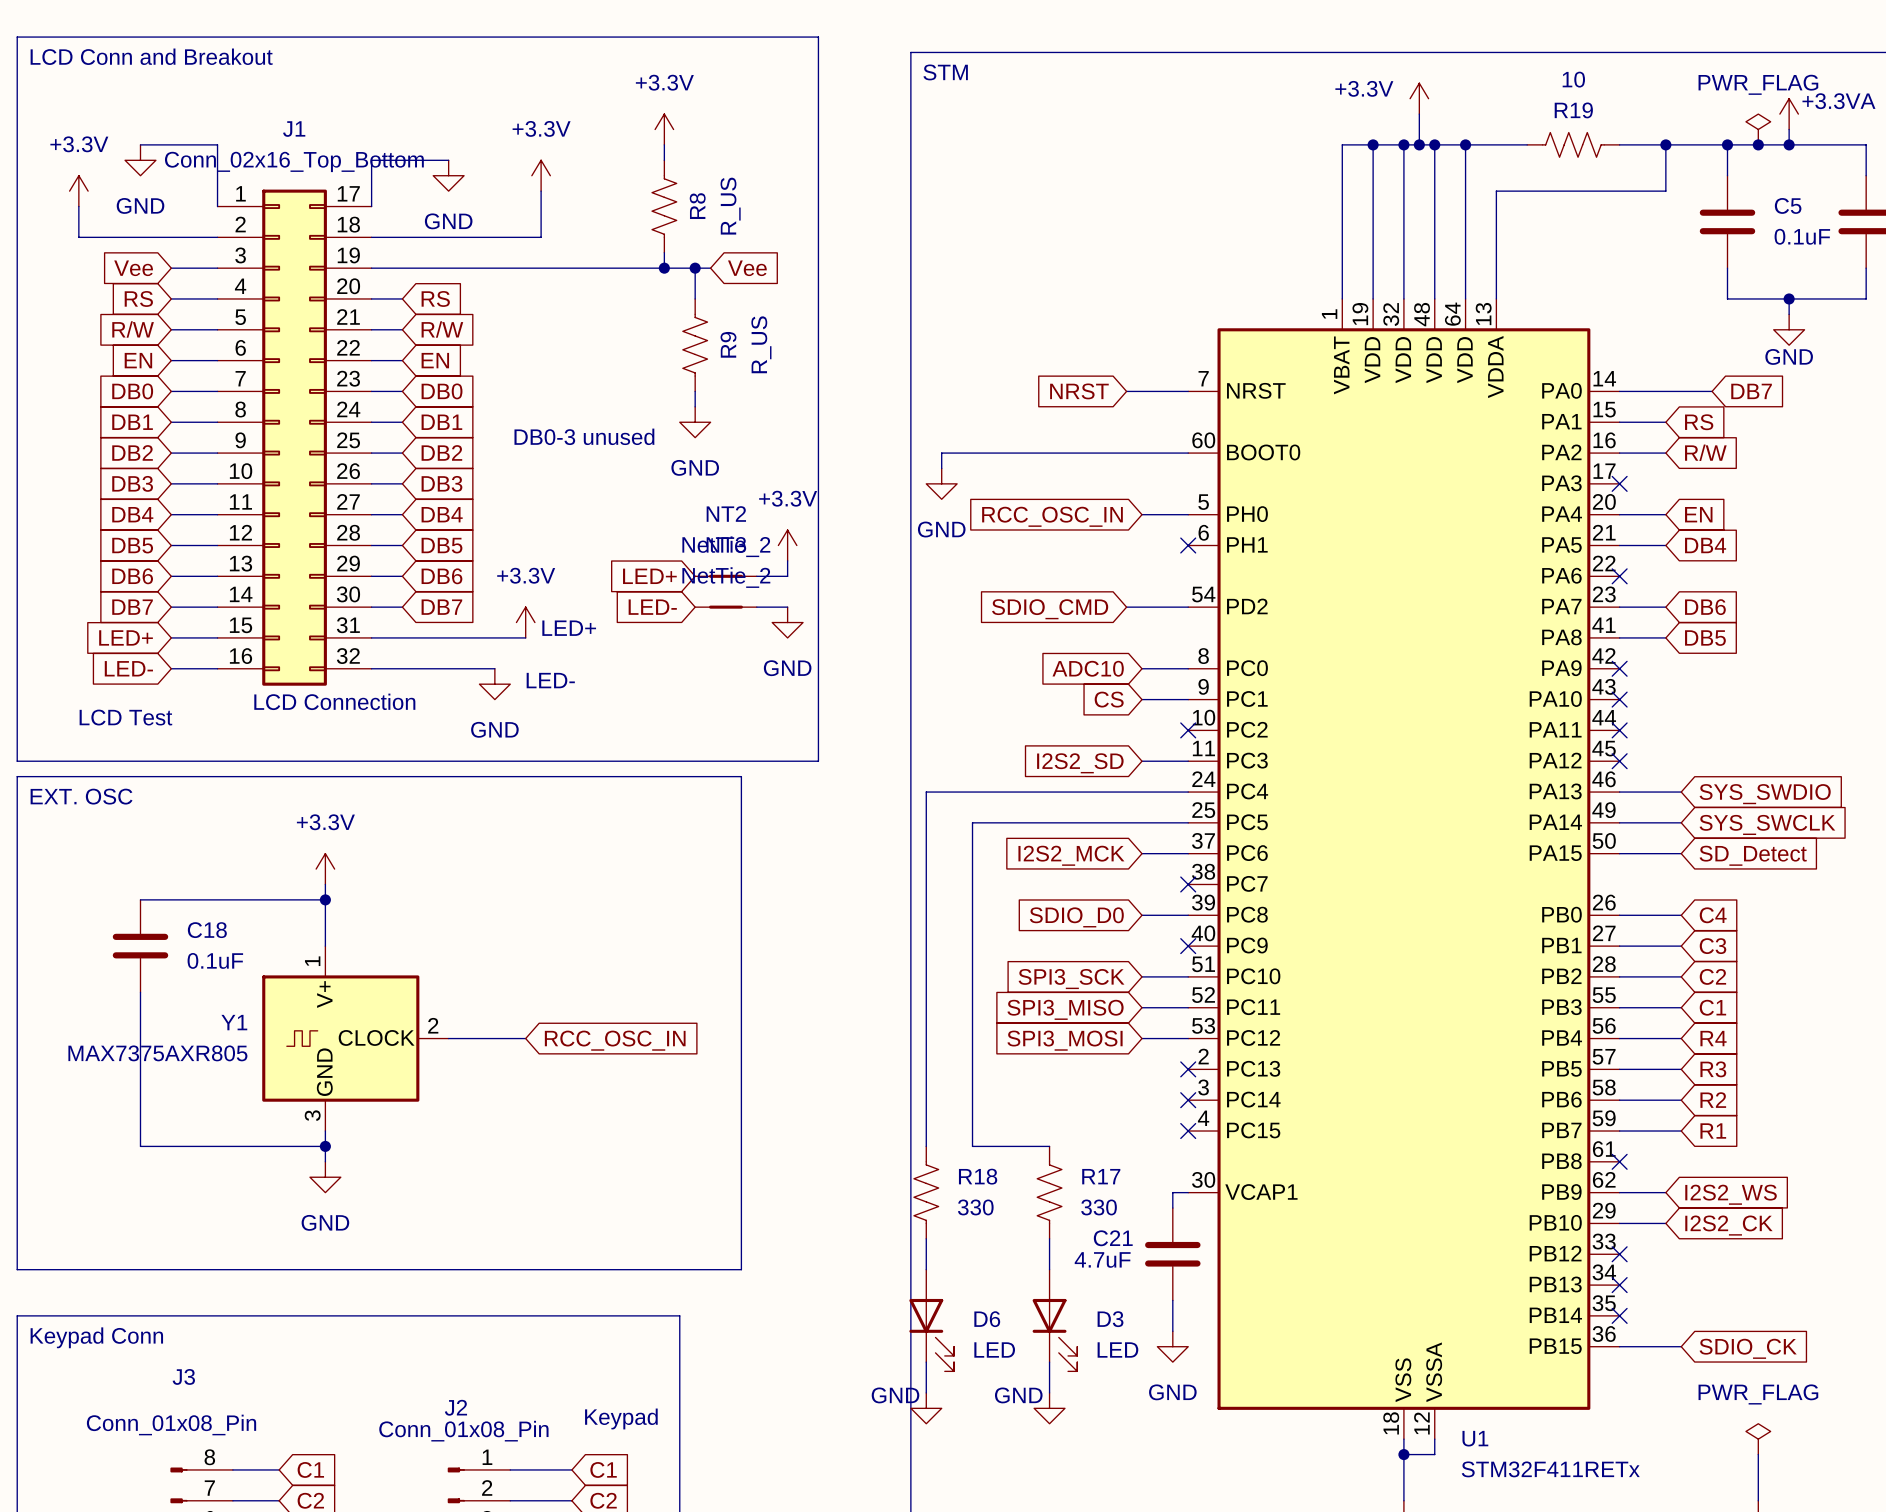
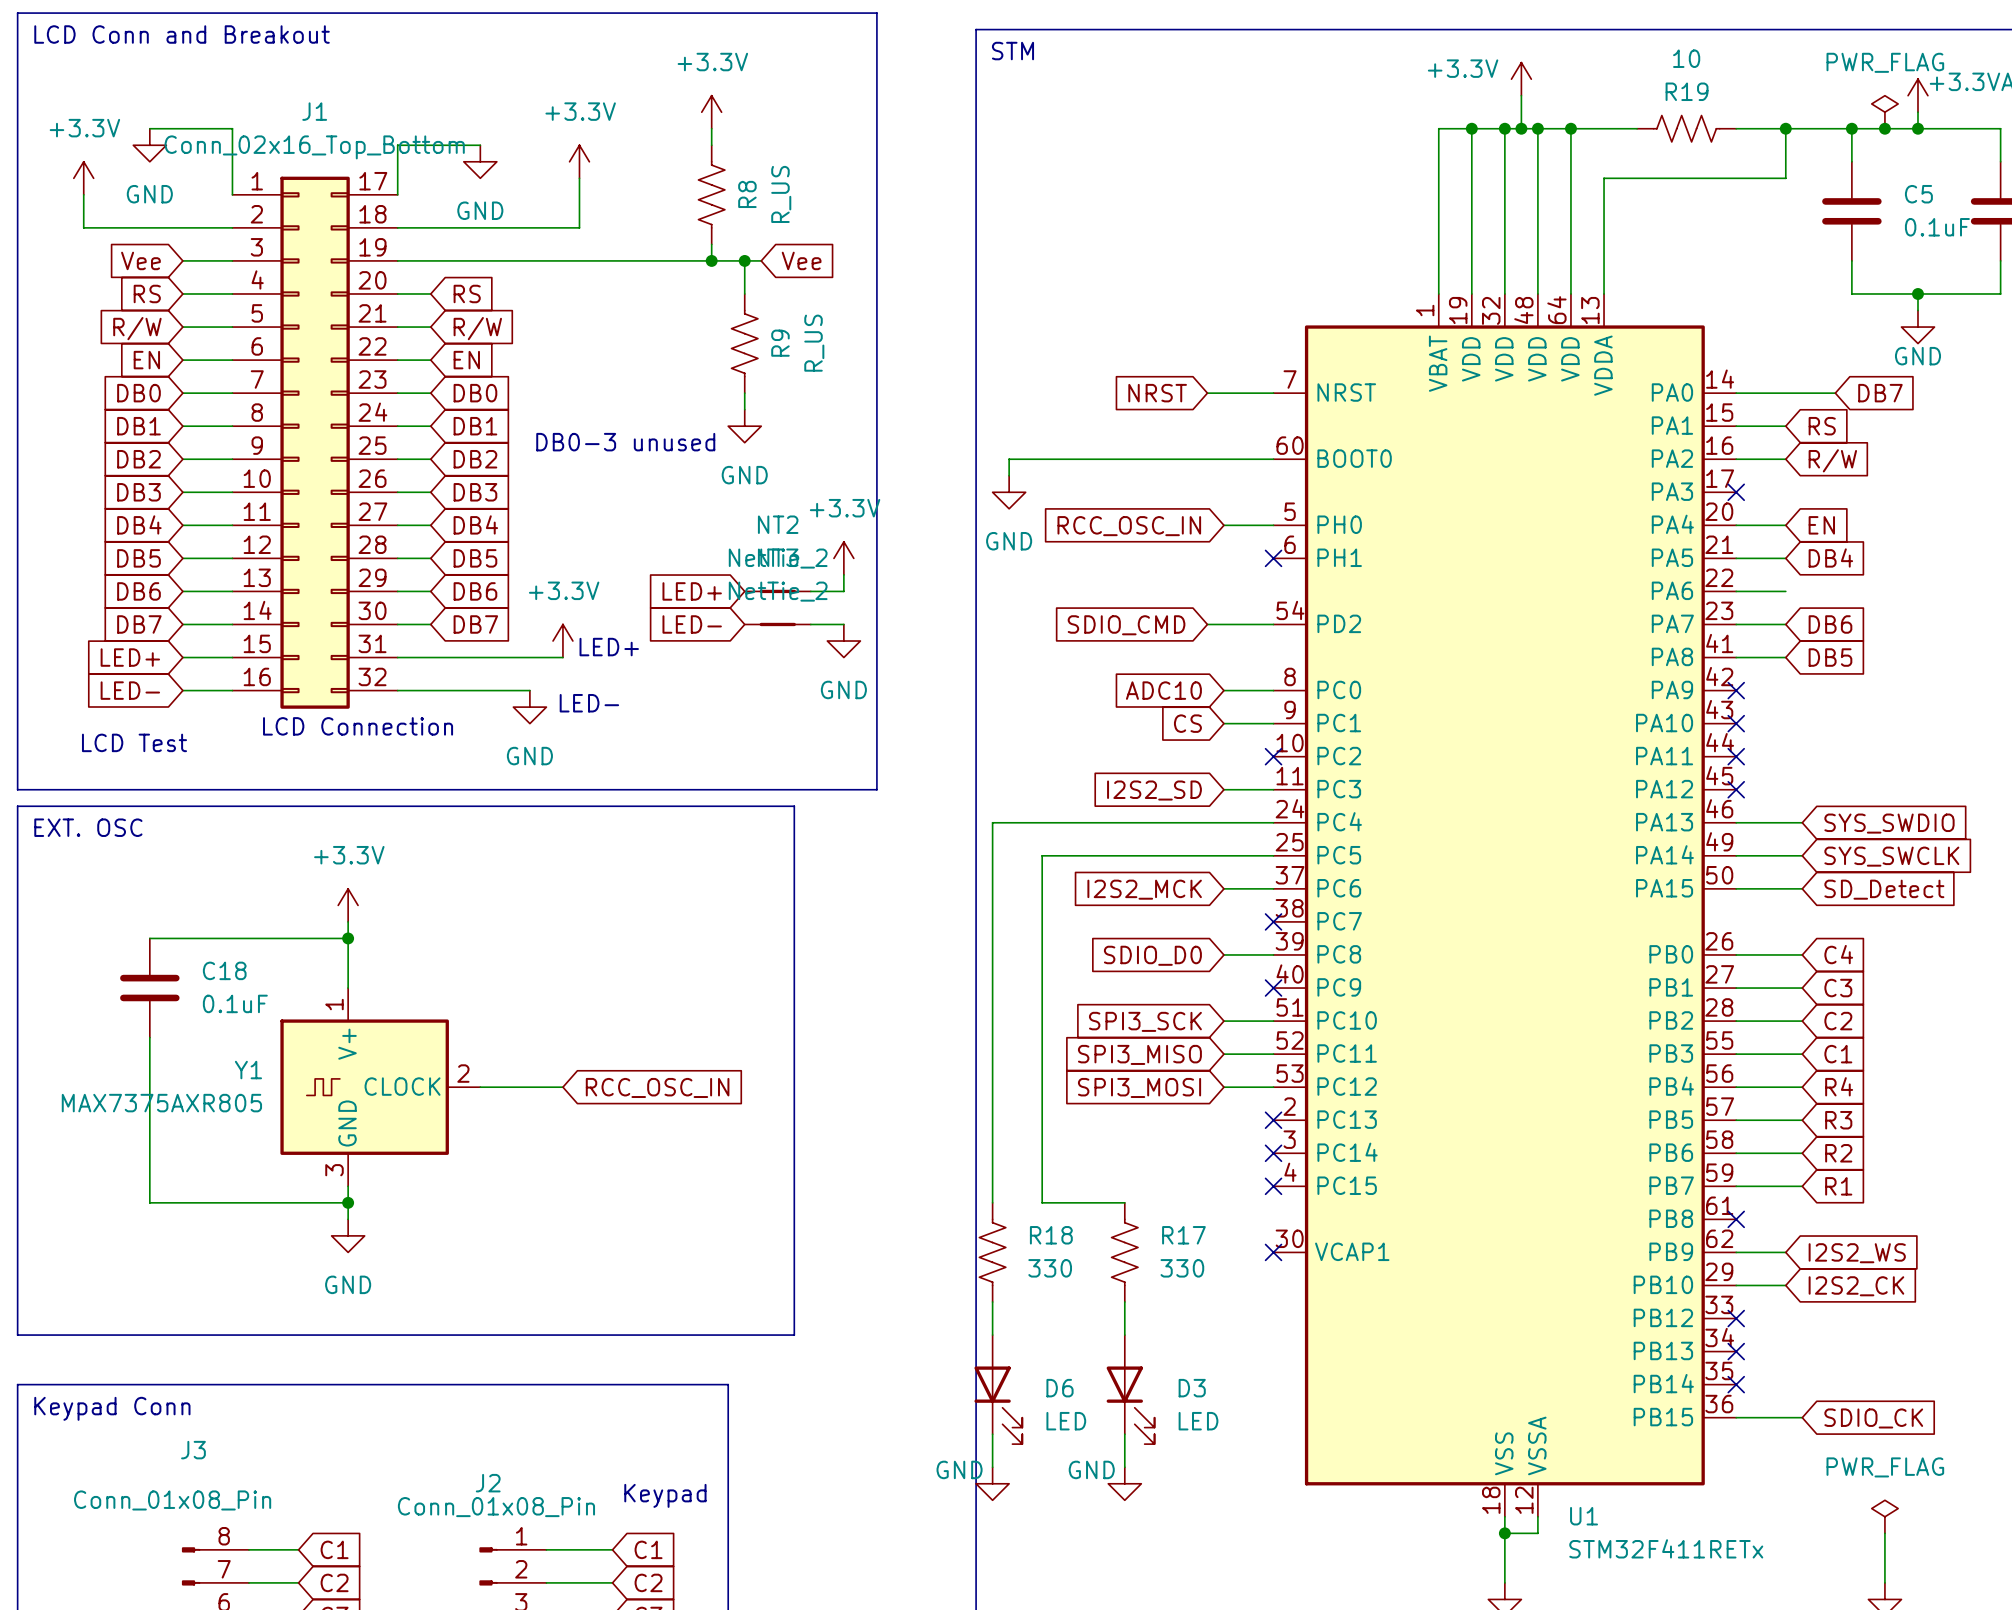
wire: none -> (1736, 591) (1785, 591)
no-connect mark: (1619, 576) -> none
wire: (1188, 1192) (1172, 1192) (1172, 1208) -> none
no-connect mark: none -> (1273, 1252)
C21: 4.7uF (1172, 1254) -> none
wire: (1172, 1300) (1172, 1331) -> none
power symbol: GND (1172, 1346) -> none

